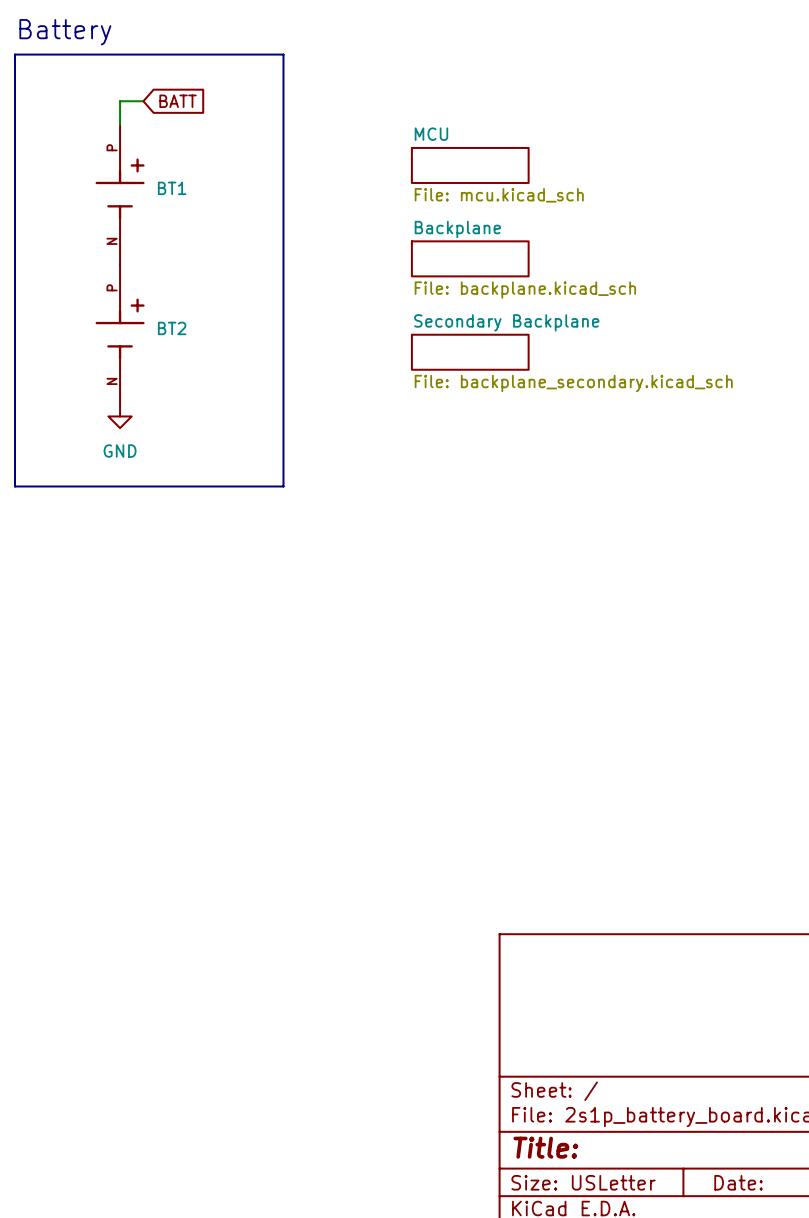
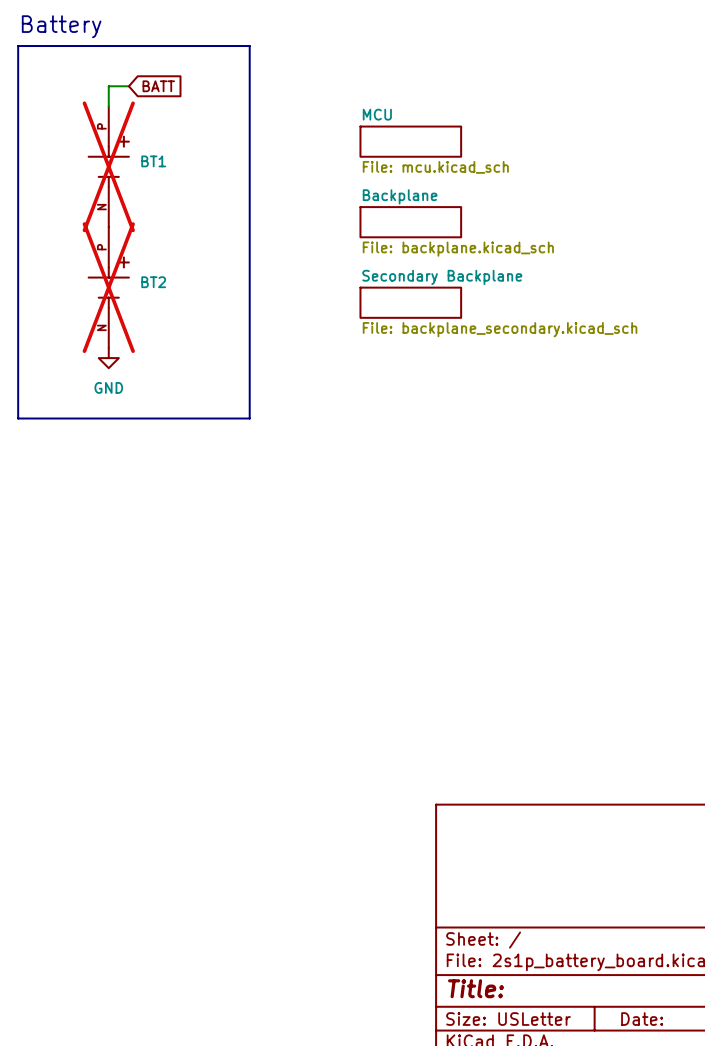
BT1 do-not-place cross: none -> (108, 166)
BT2 do-not-place cross: none -> (108, 287)

